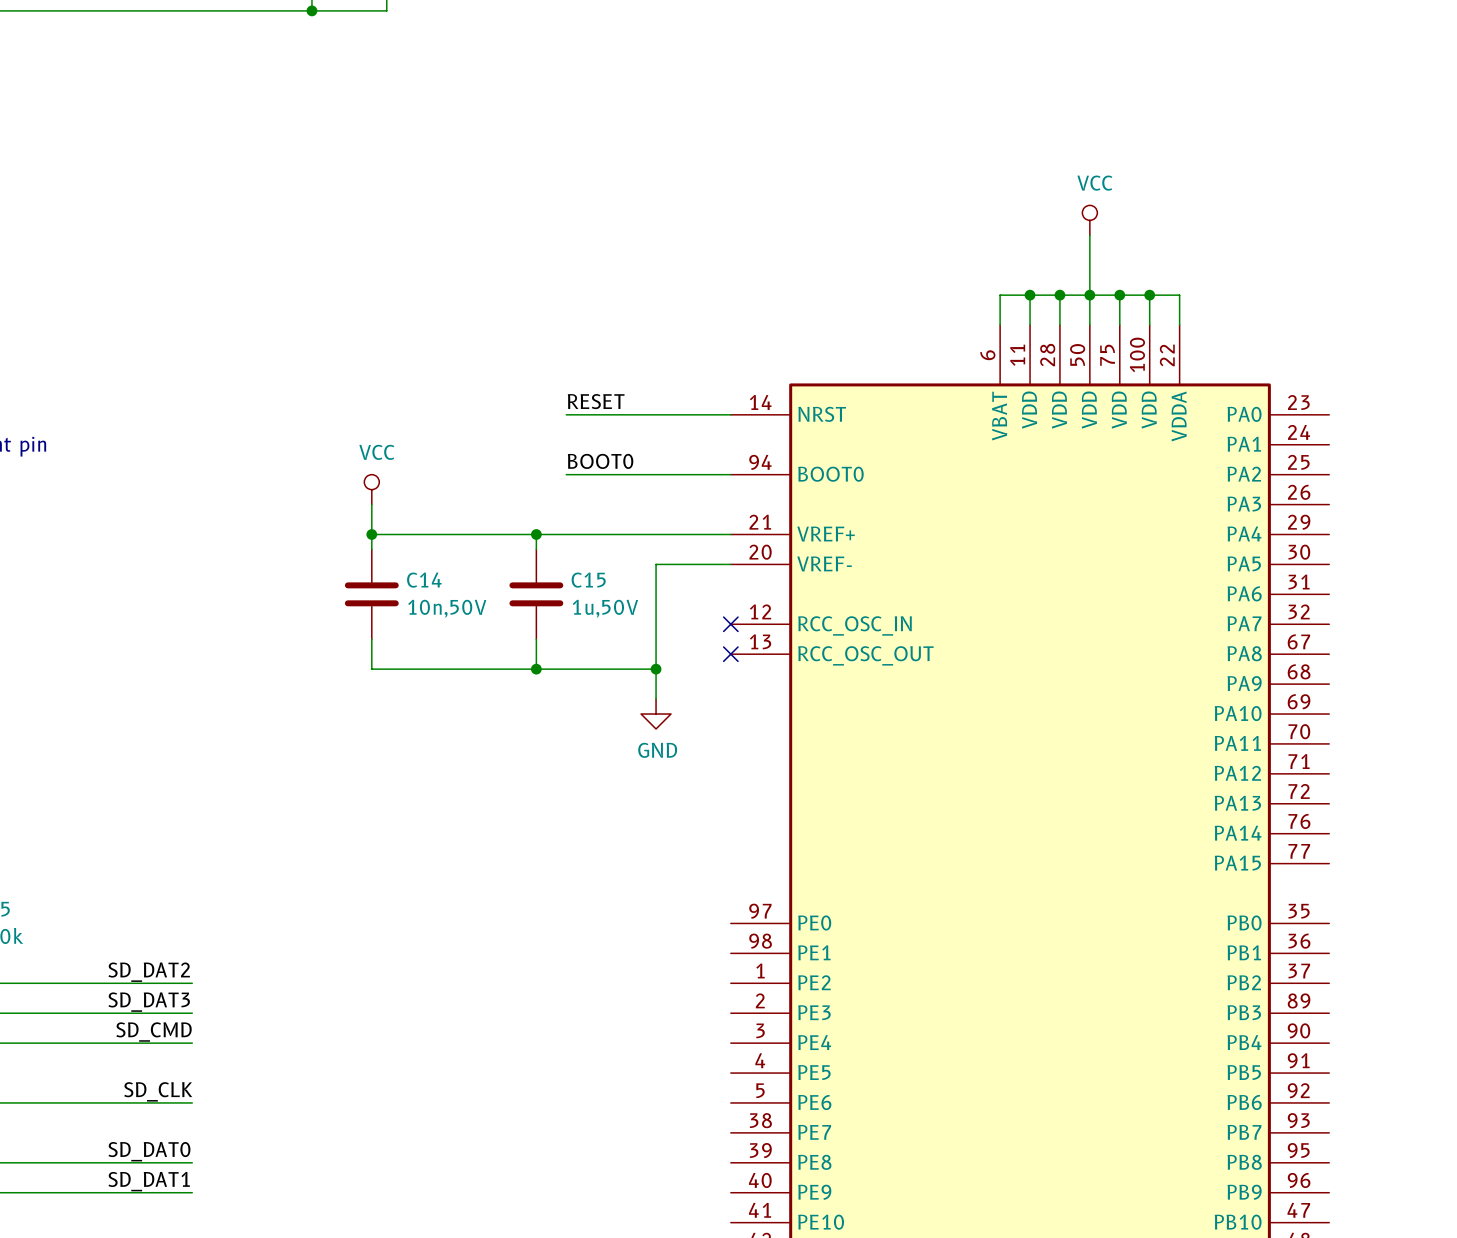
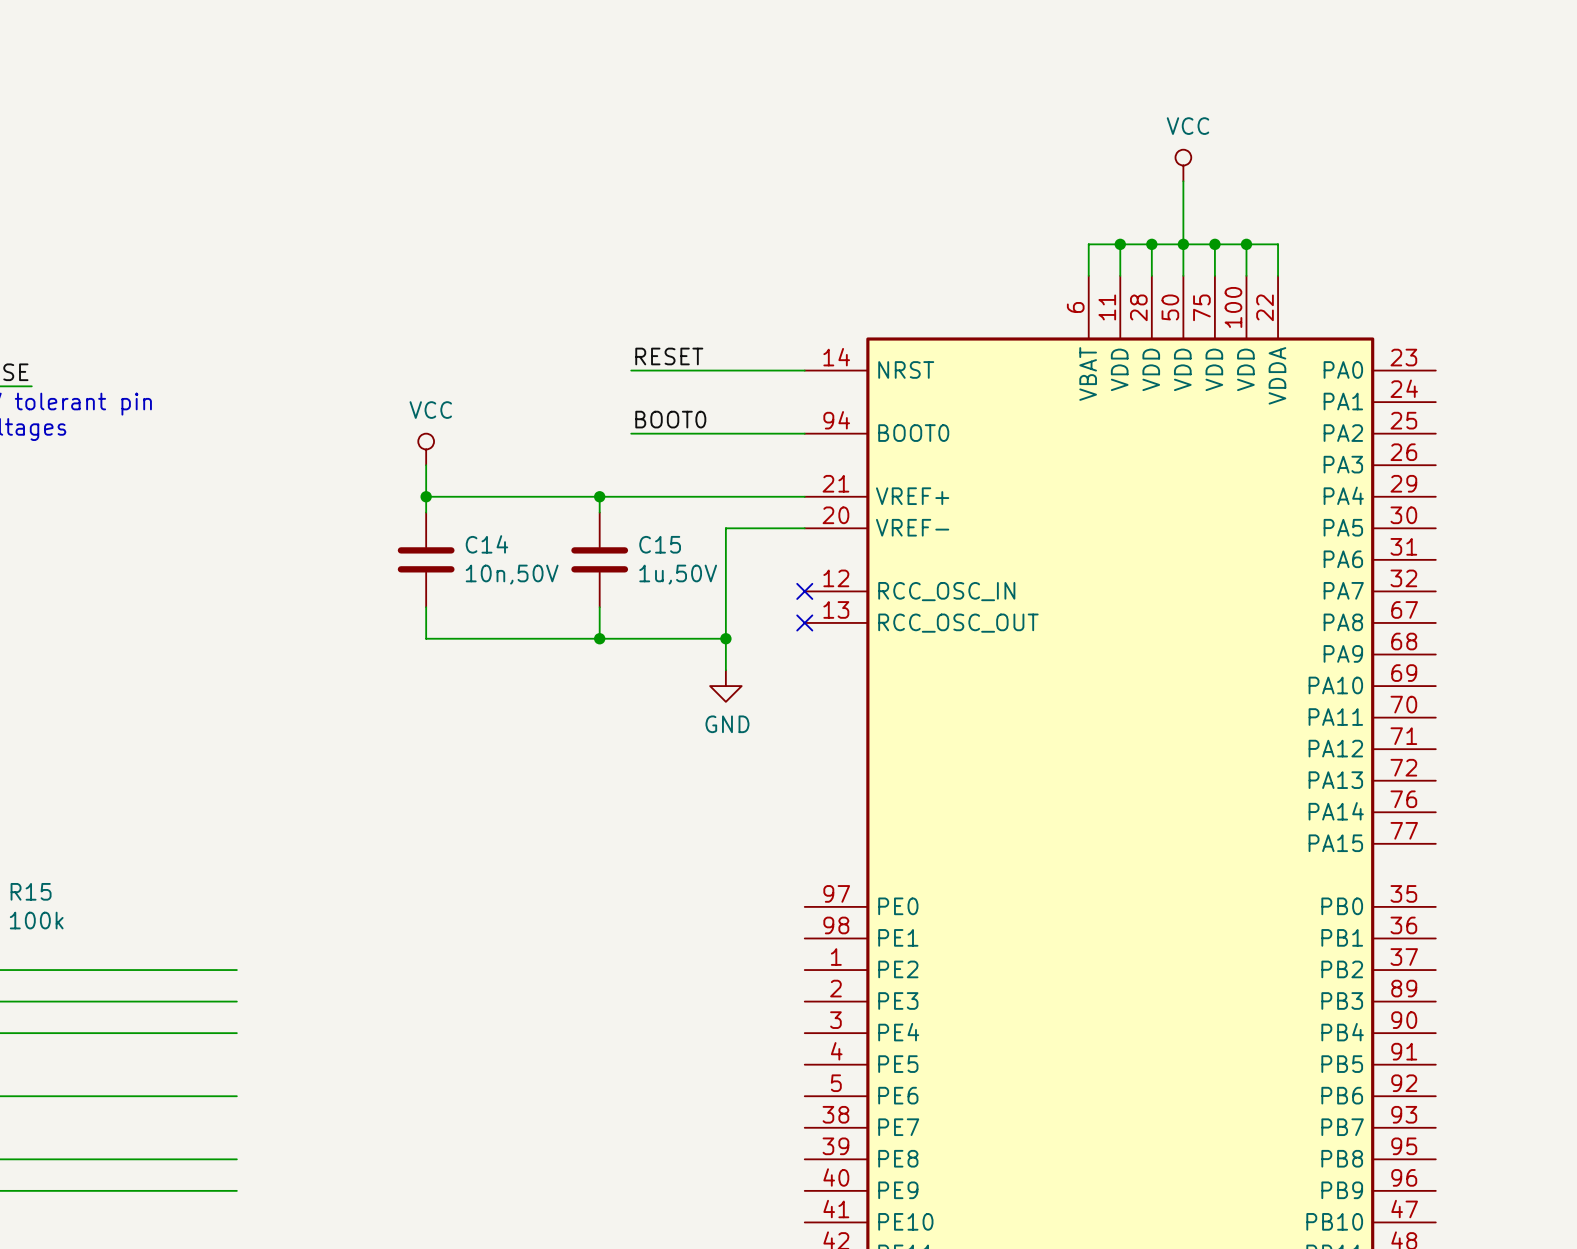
label: SD_DAT2 (149, 972) -> none
label: SD_DAT3 (149, 1002) -> none
label: SD_CMD (154, 1032) -> none
label: SD_CLK (158, 1091) -> none
label: SD_DAT0 (149, 1151) -> none
label: SD_DAT1 (149, 1181) -> none

